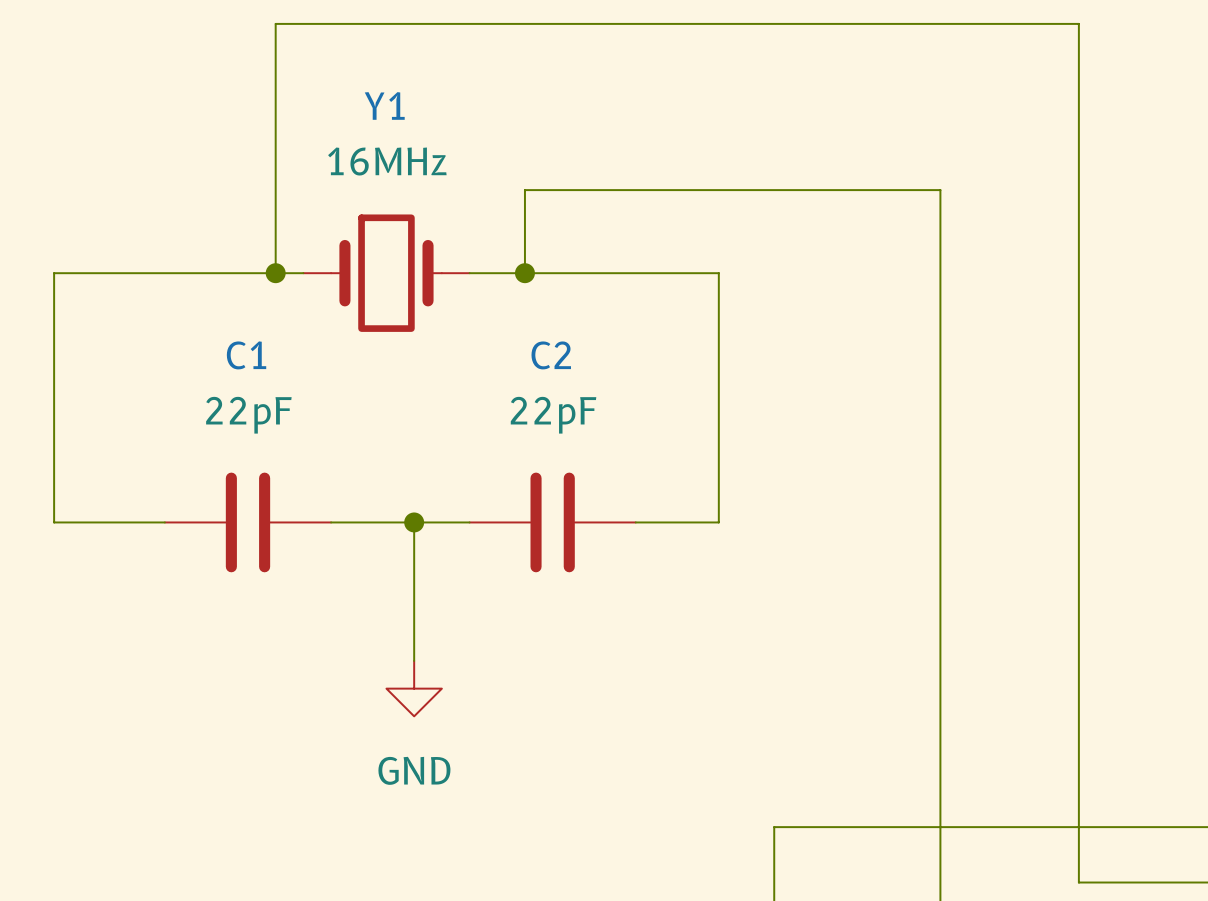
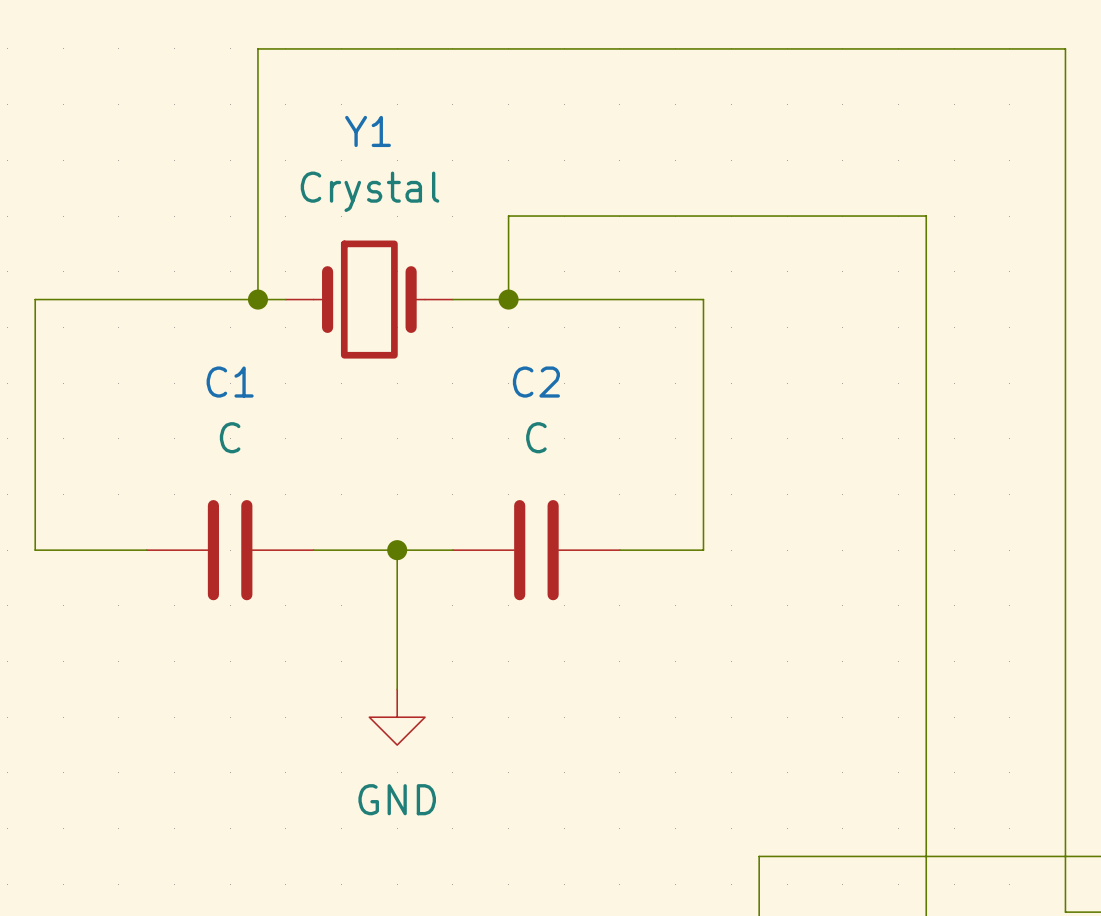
Y1 value: 16MHz (387, 161) -> Crystal (370, 191)
C1 value: 22pF (248, 415) -> C (230, 437)
C2 value: 22pF (553, 415) -> C (536, 437)

